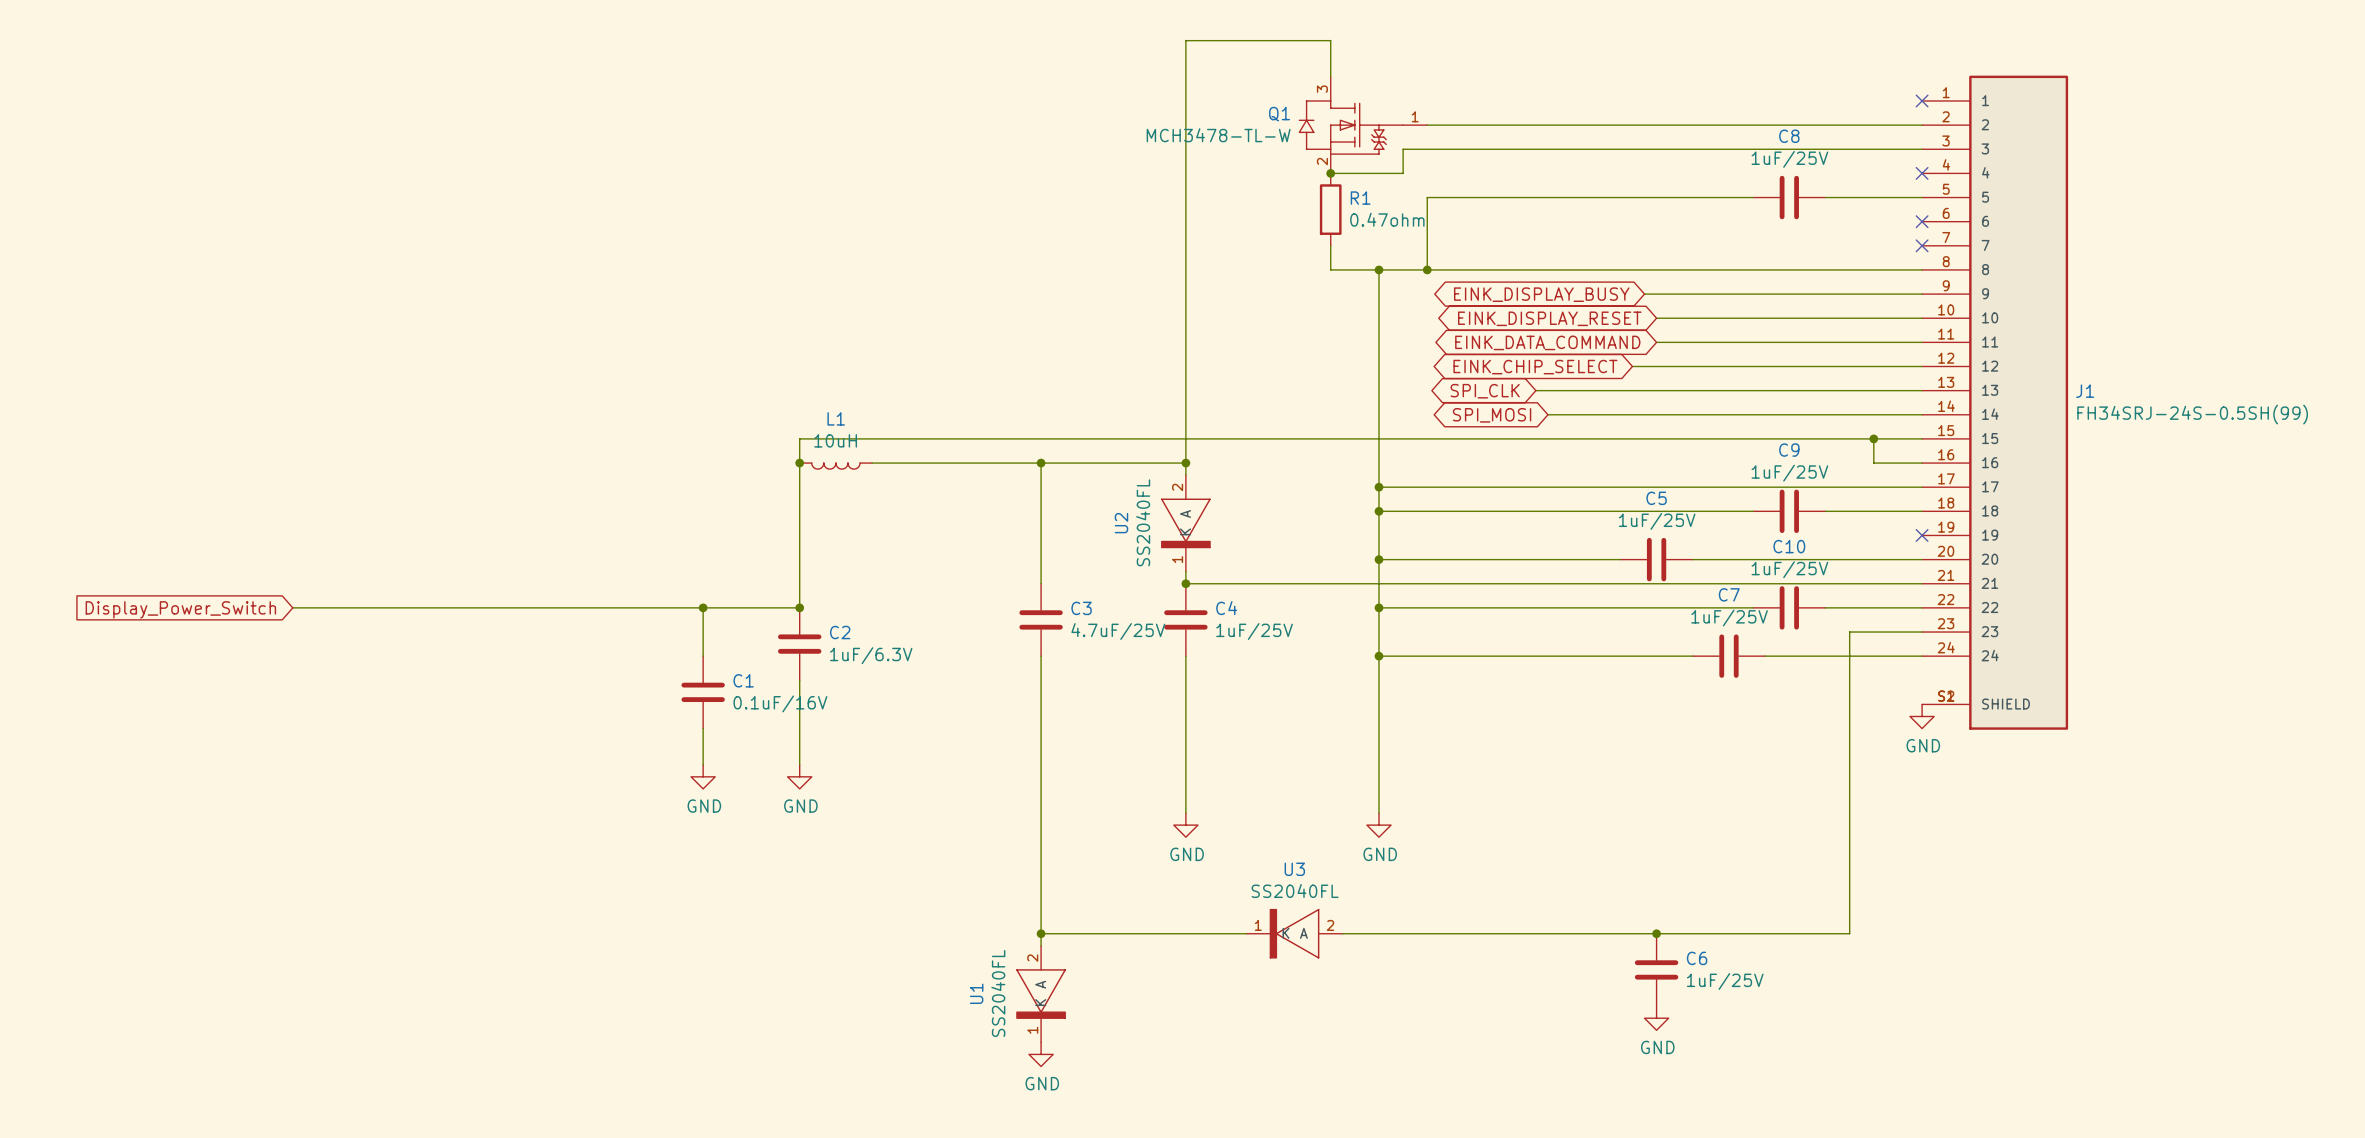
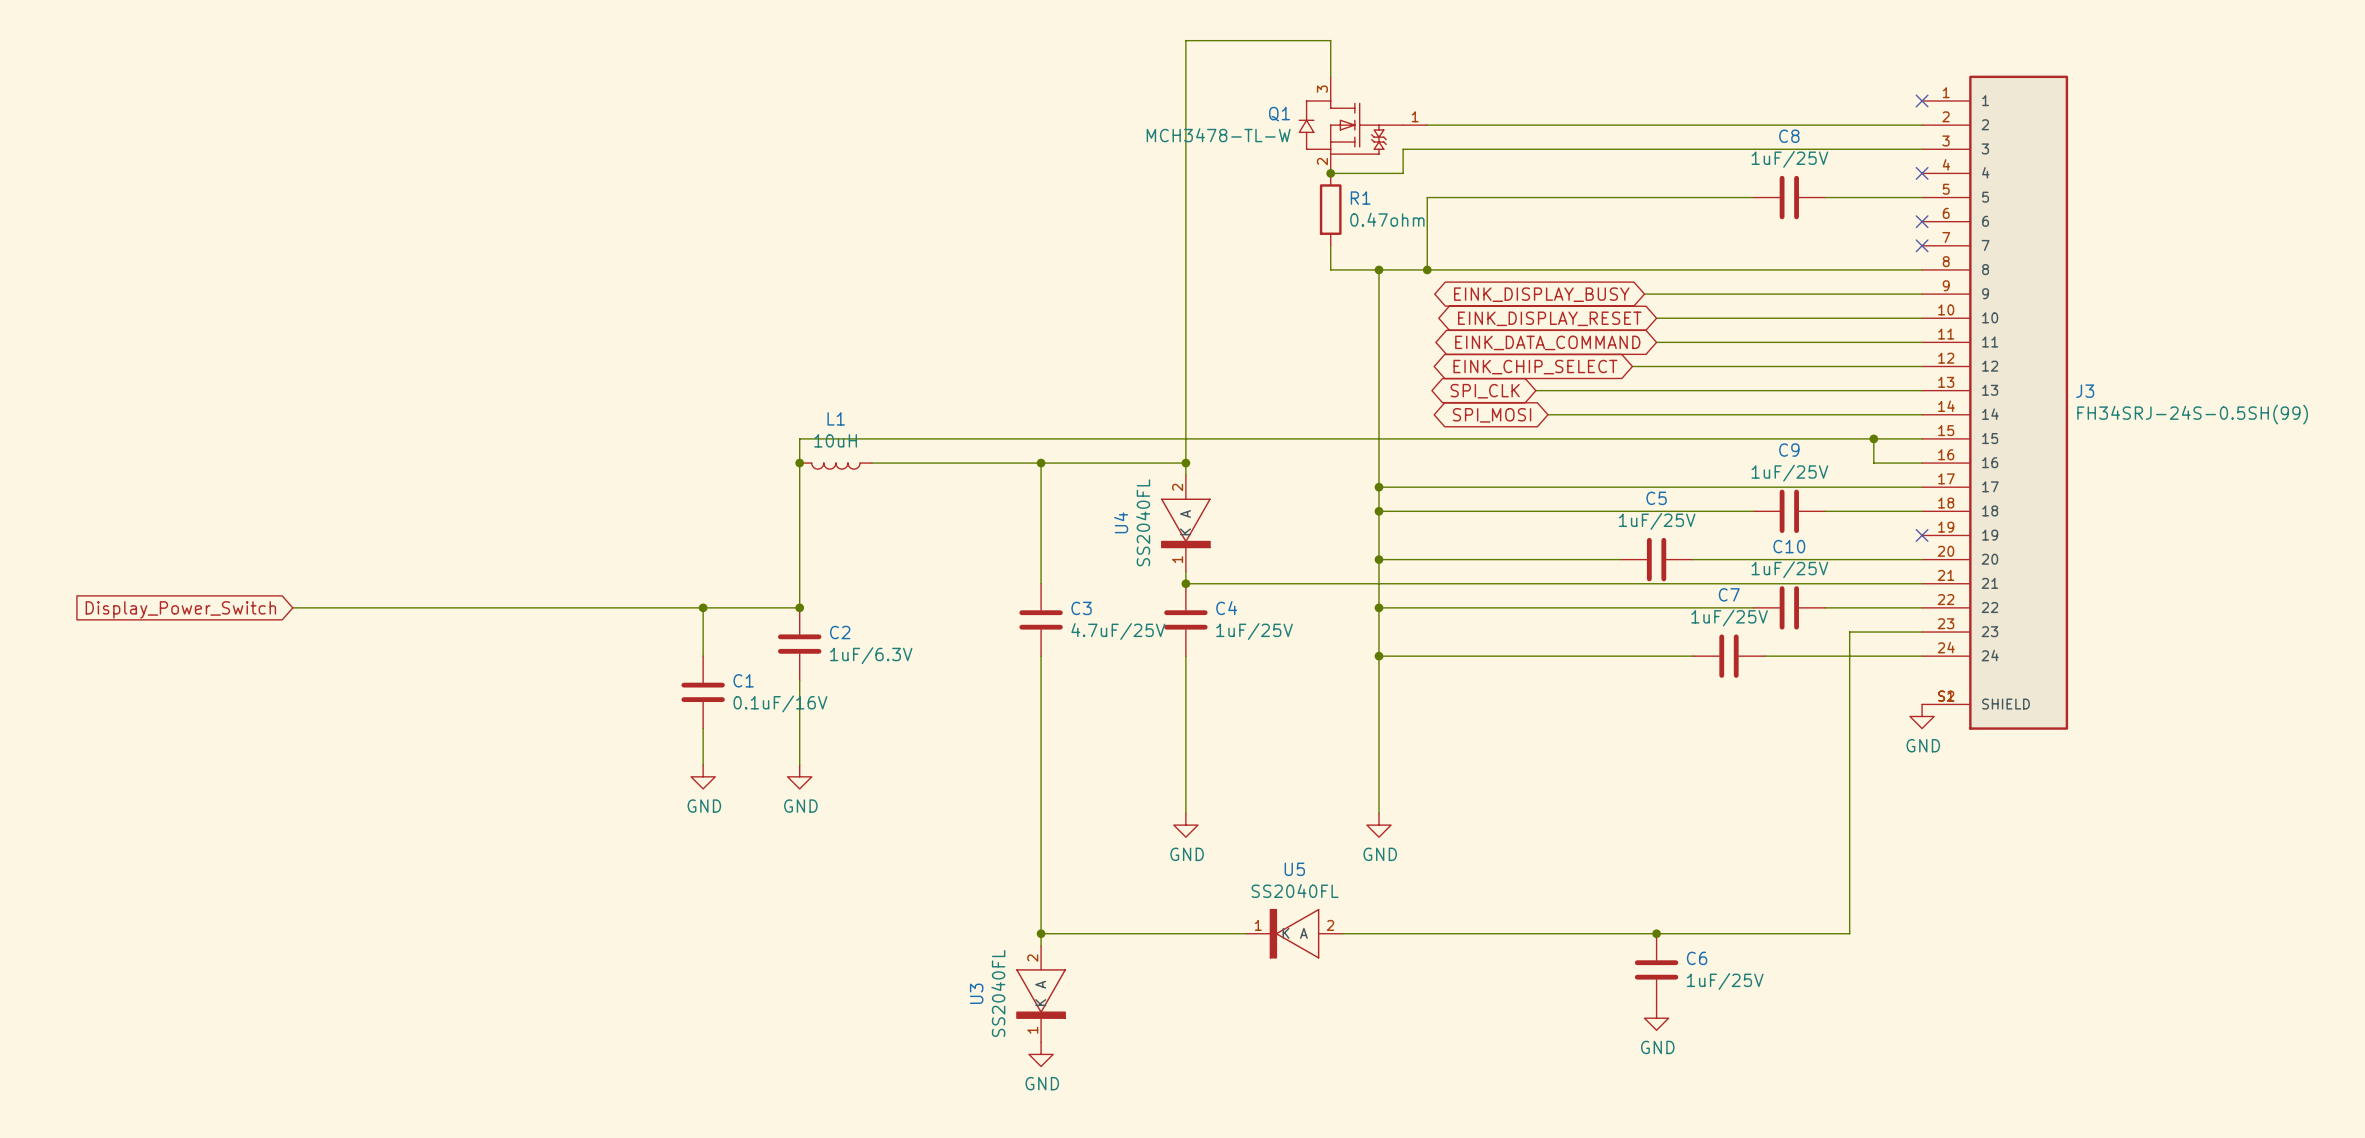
J1 name: J1 (2085, 391) -> J3 (2085, 391)
U2 name: U2 (1121, 523) -> U4 (1121, 522)
U3 name: U3 (1294, 869) -> U5 (1294, 869)
U1 name: U1 (976, 993) -> U3 (976, 993)

